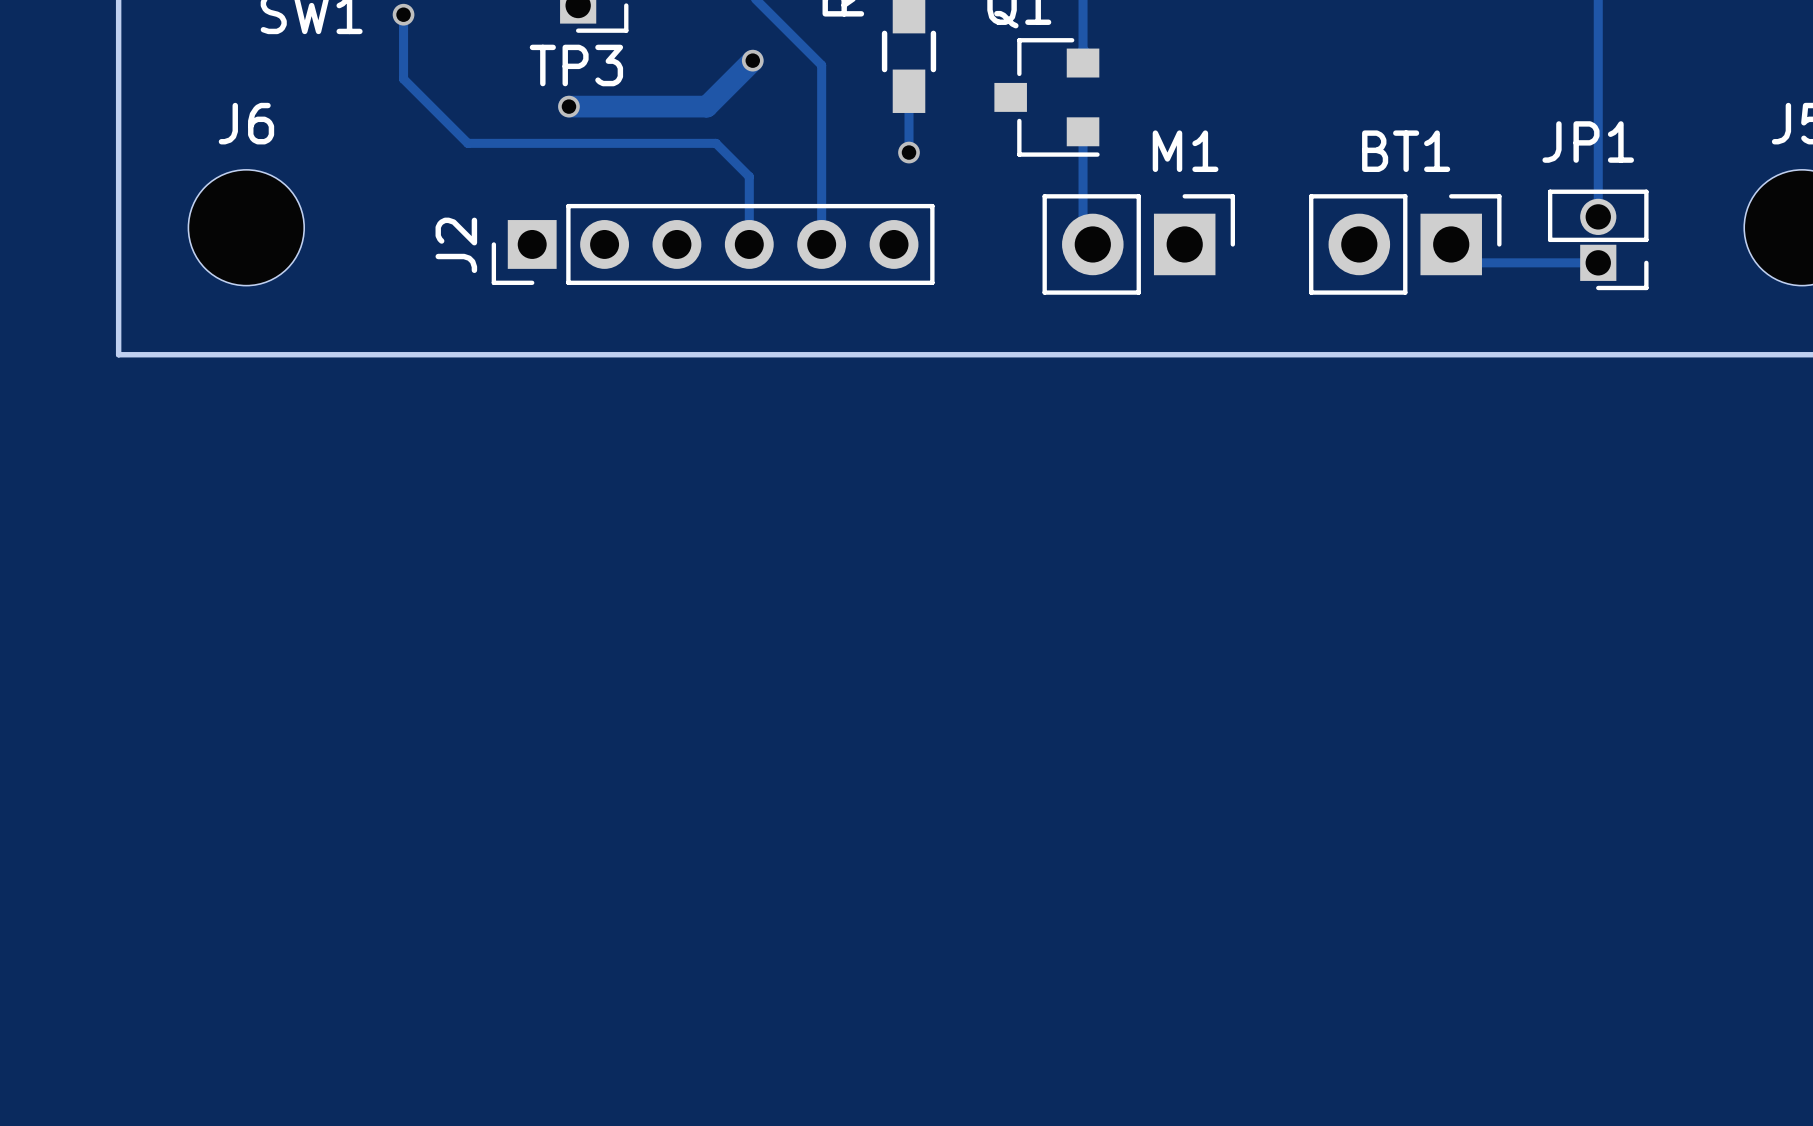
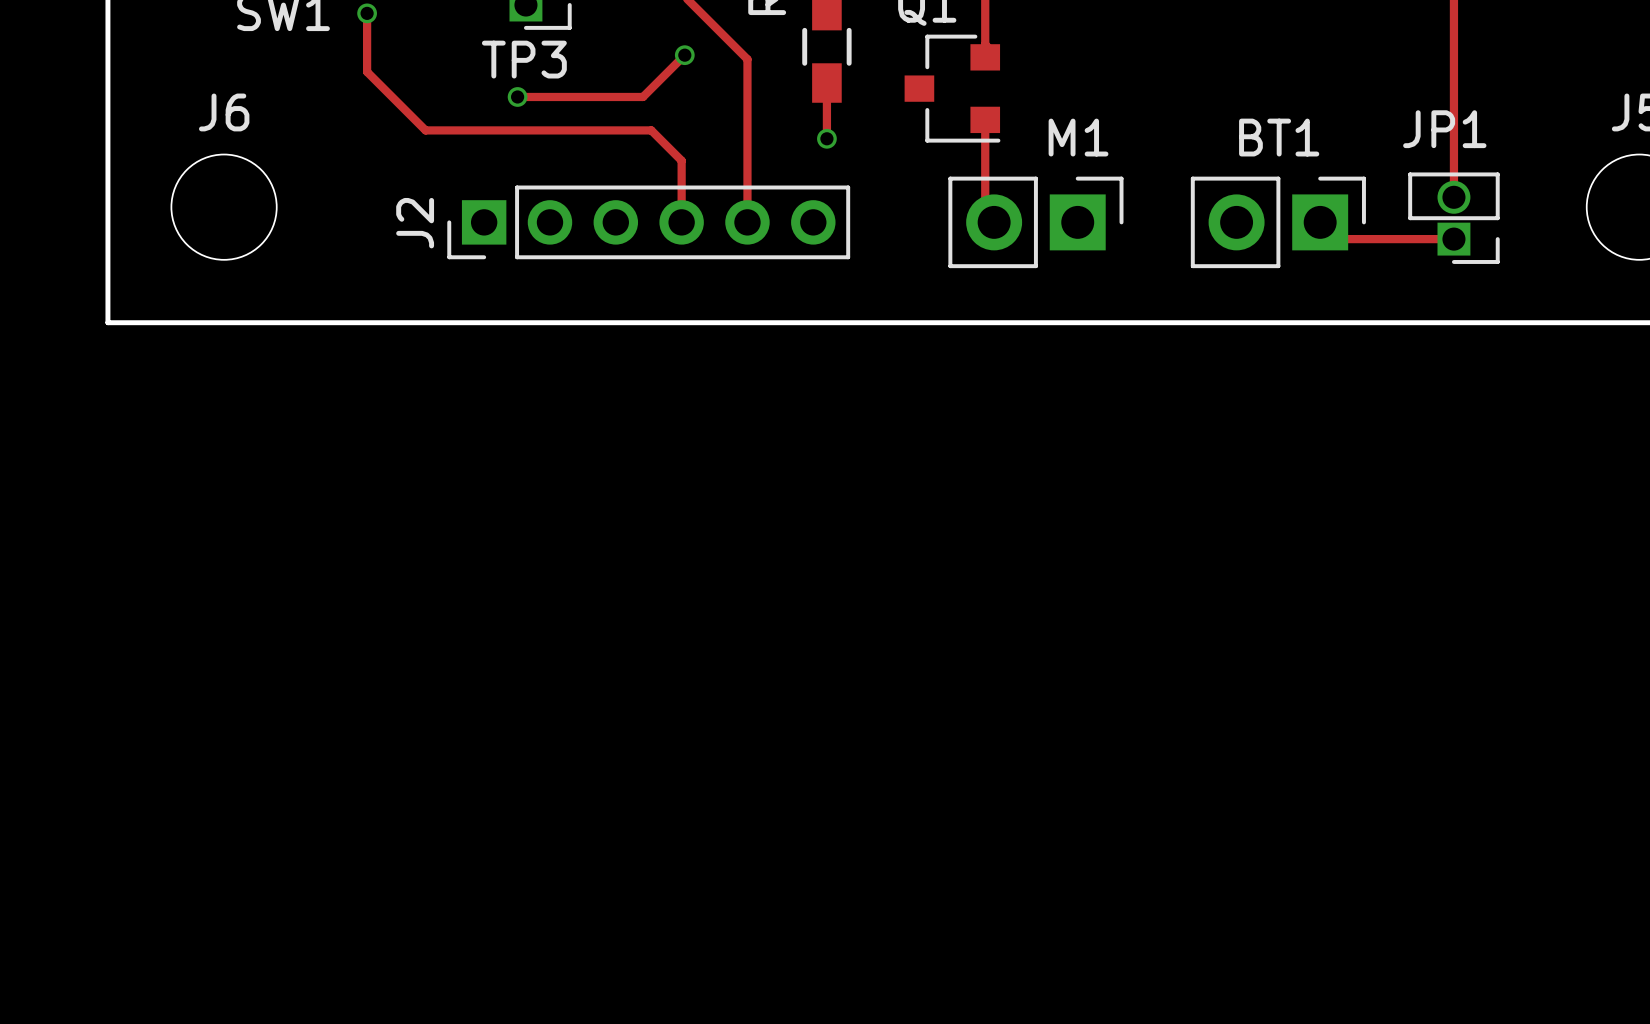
track width: thick (752, 60) (706, 106) (568, 106) -> thin (684, 55) (643, 96) (517, 96)

